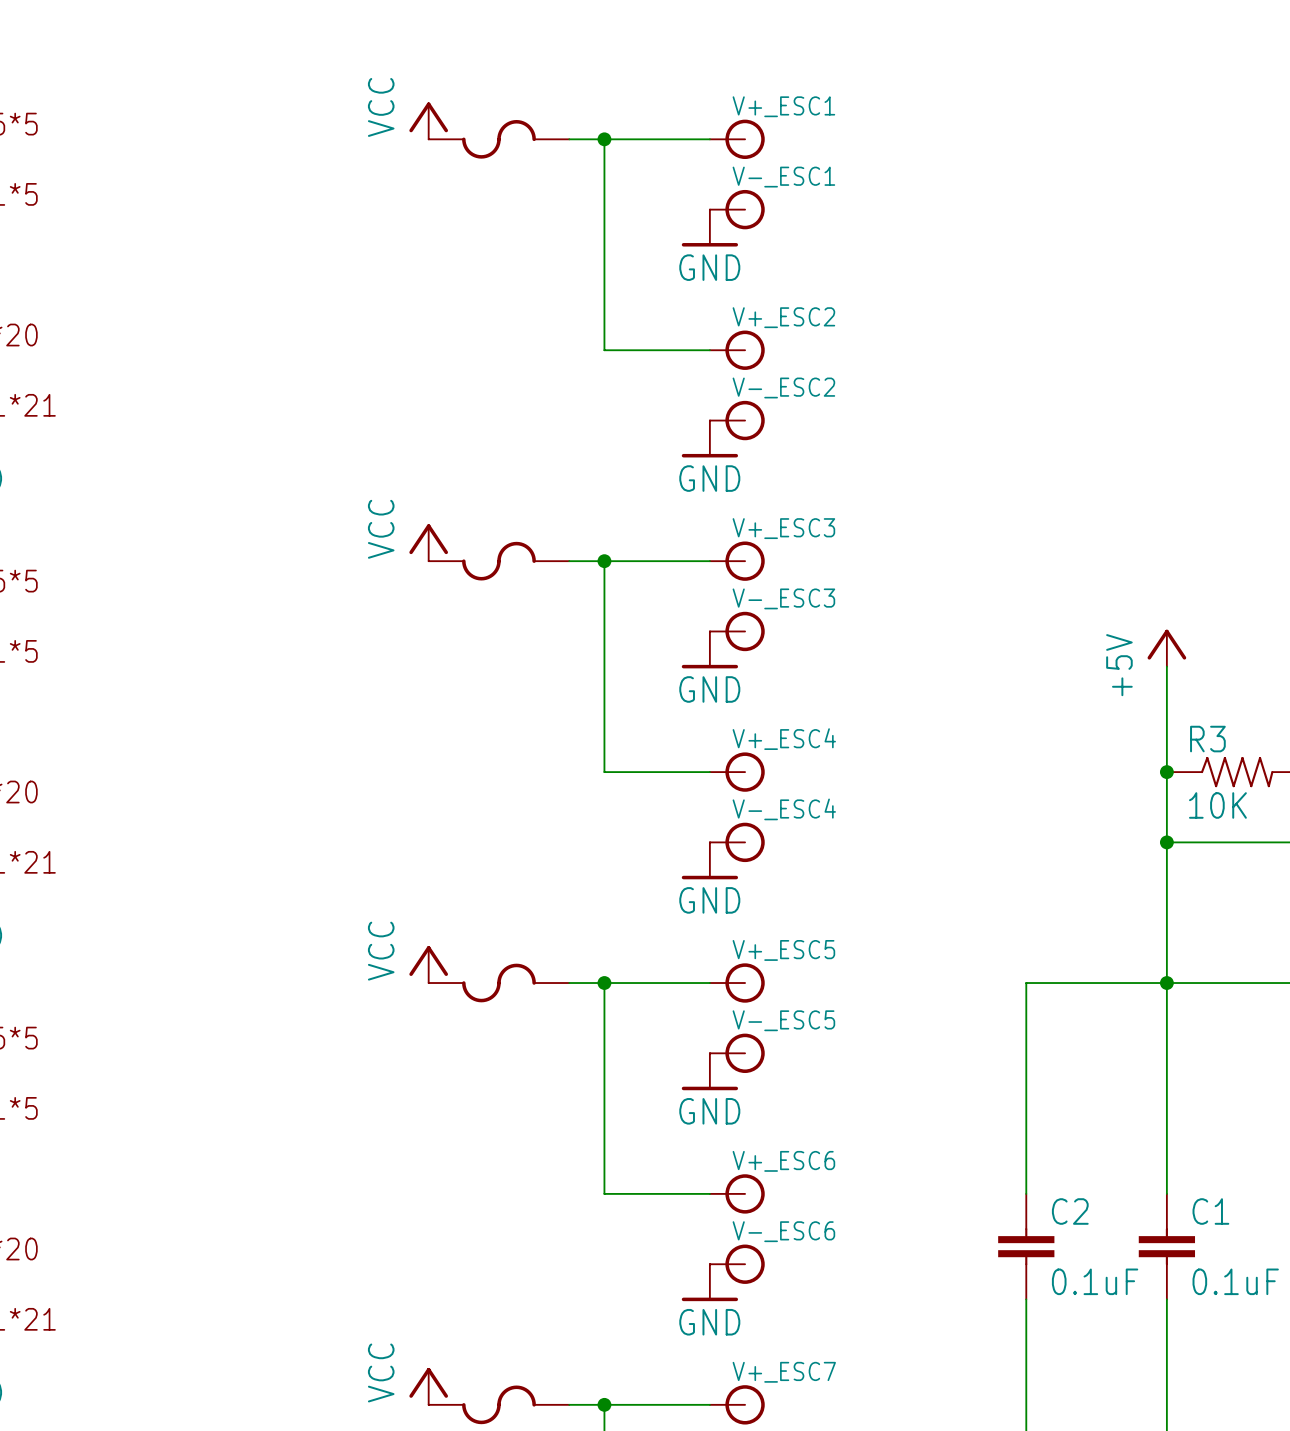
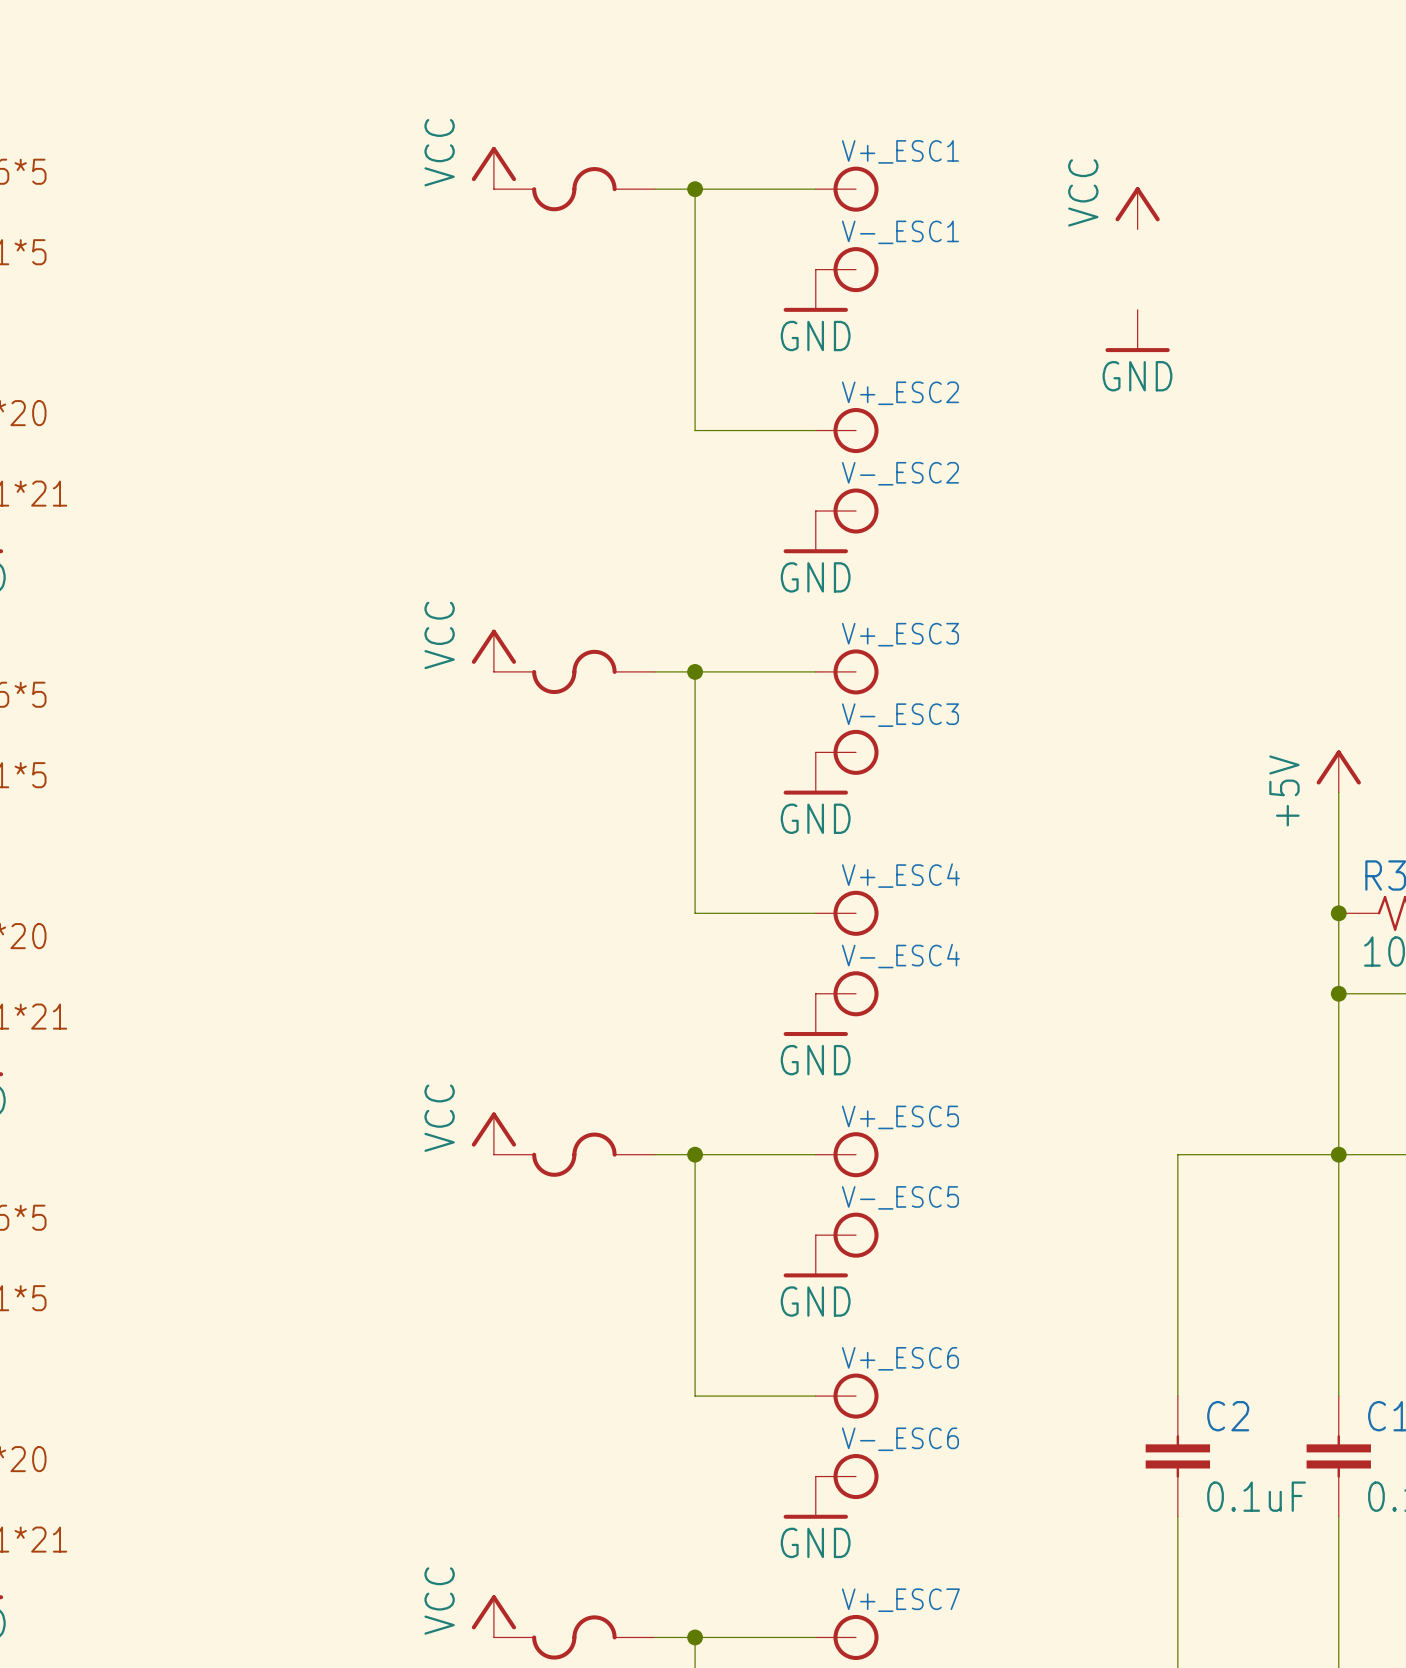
power symbol: none -> VCC (1137, 208)
power symbol: none -> GND (1137, 330)

